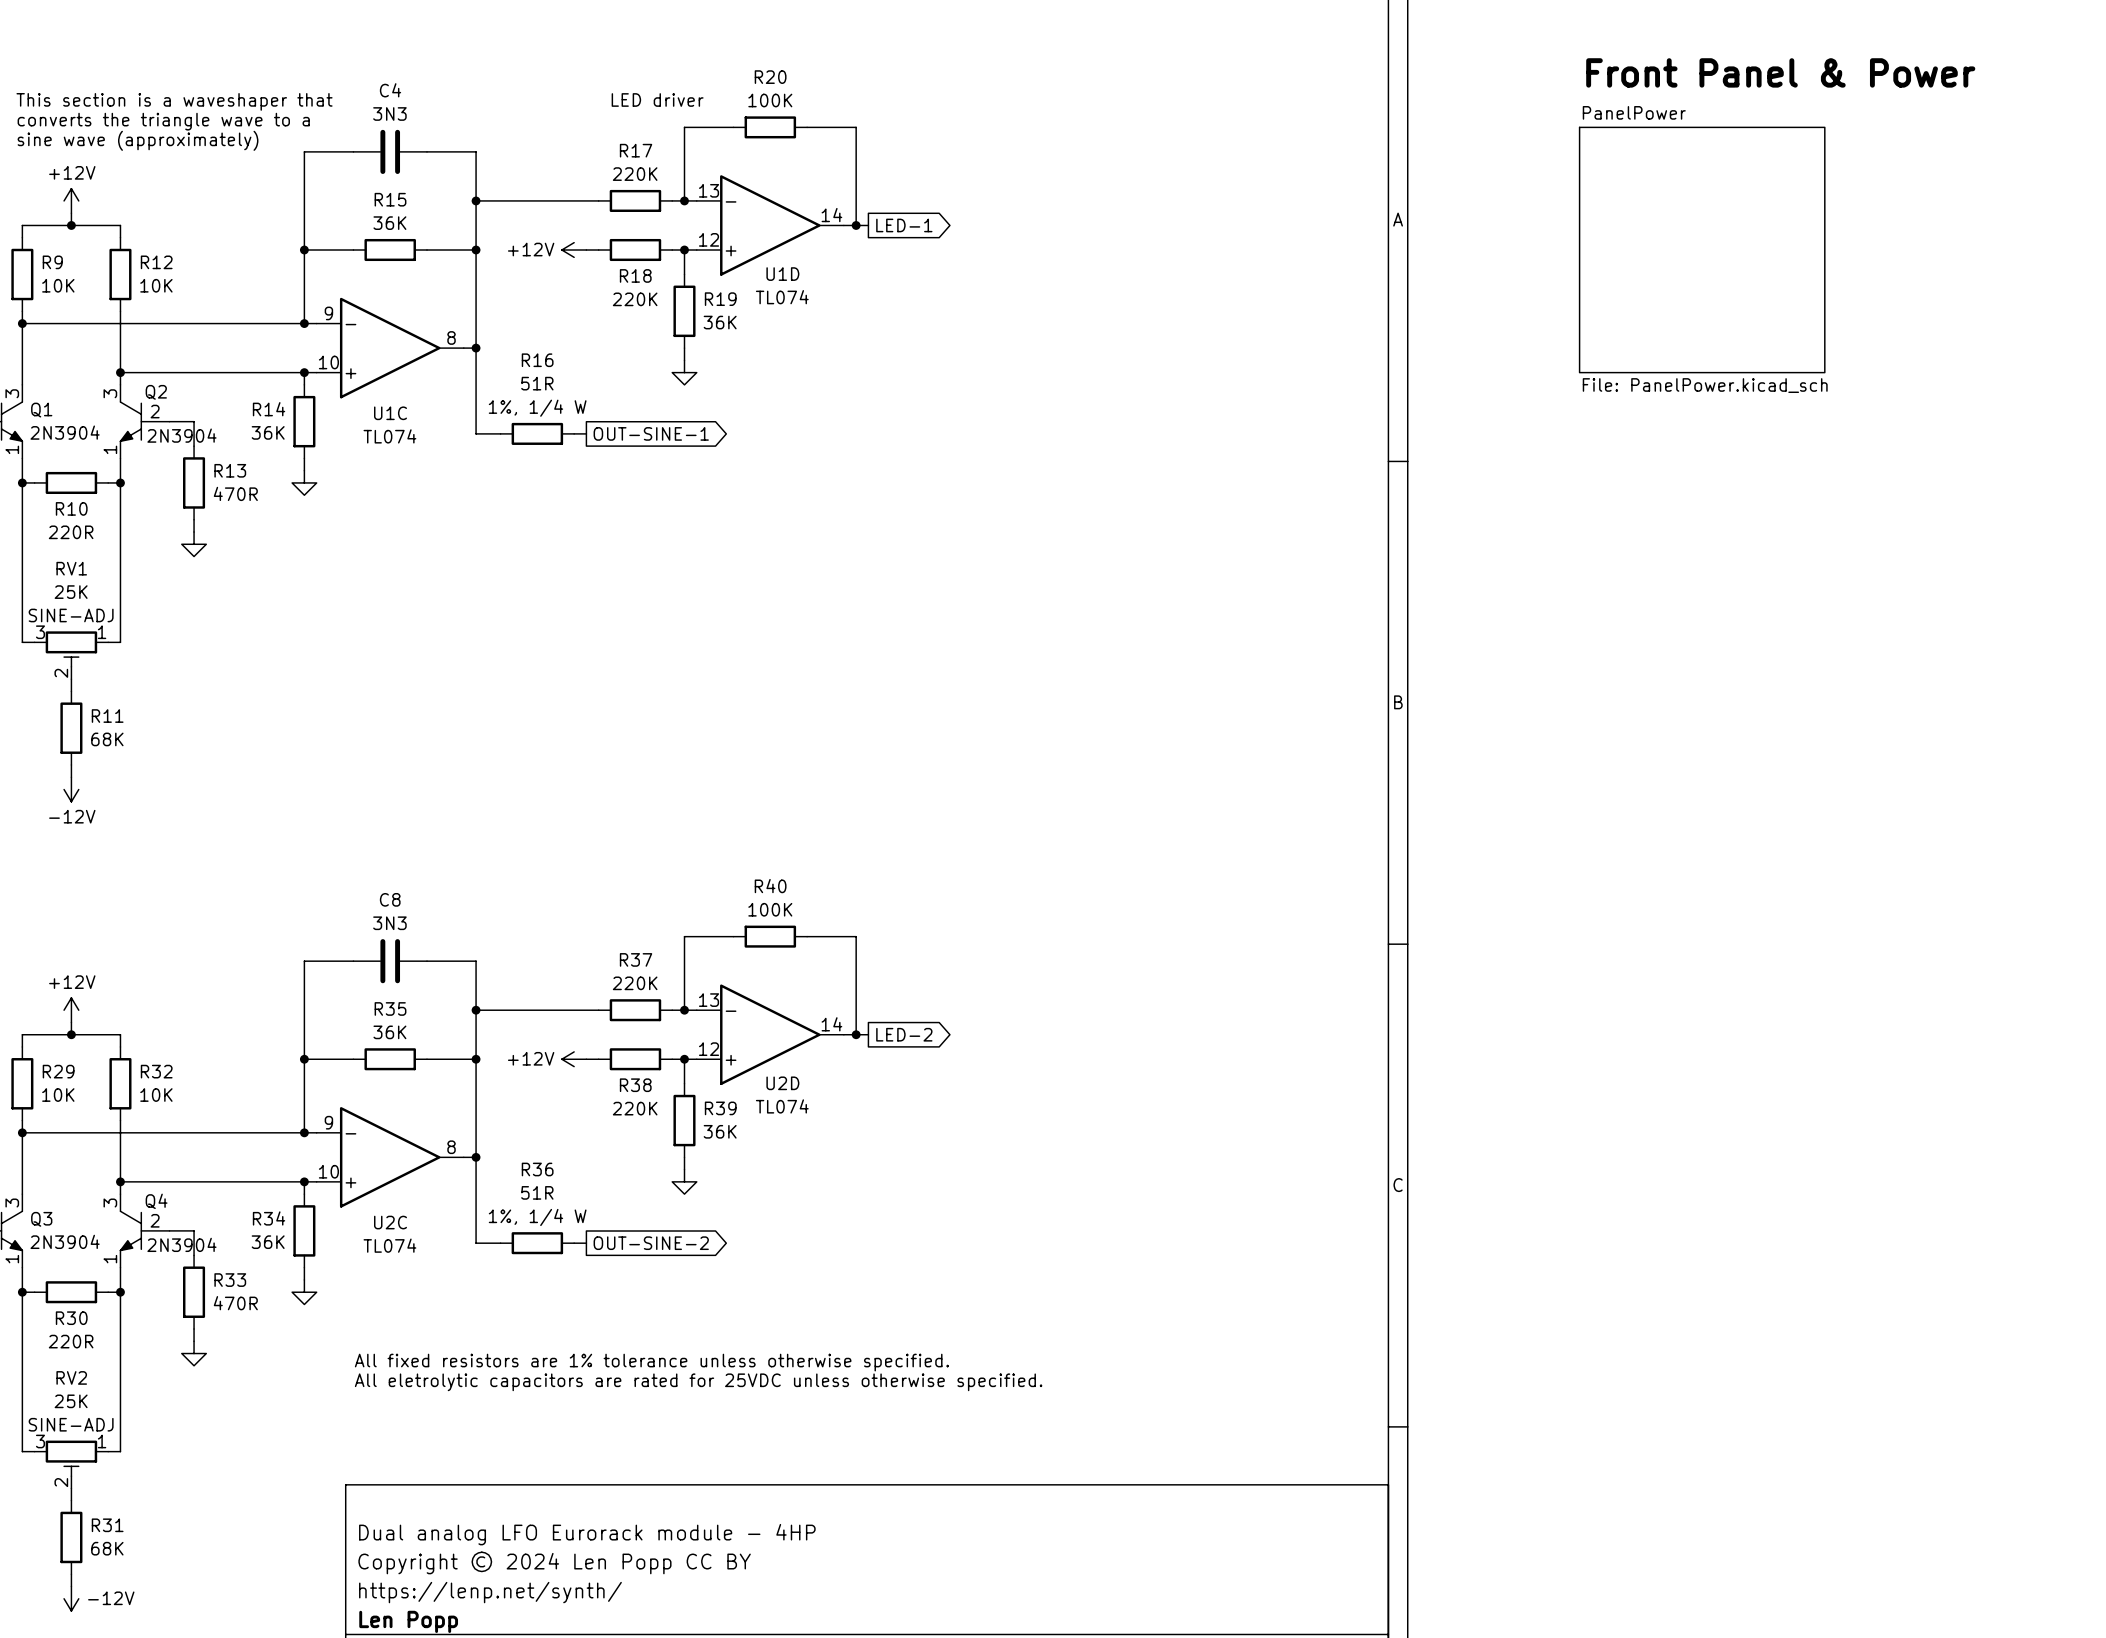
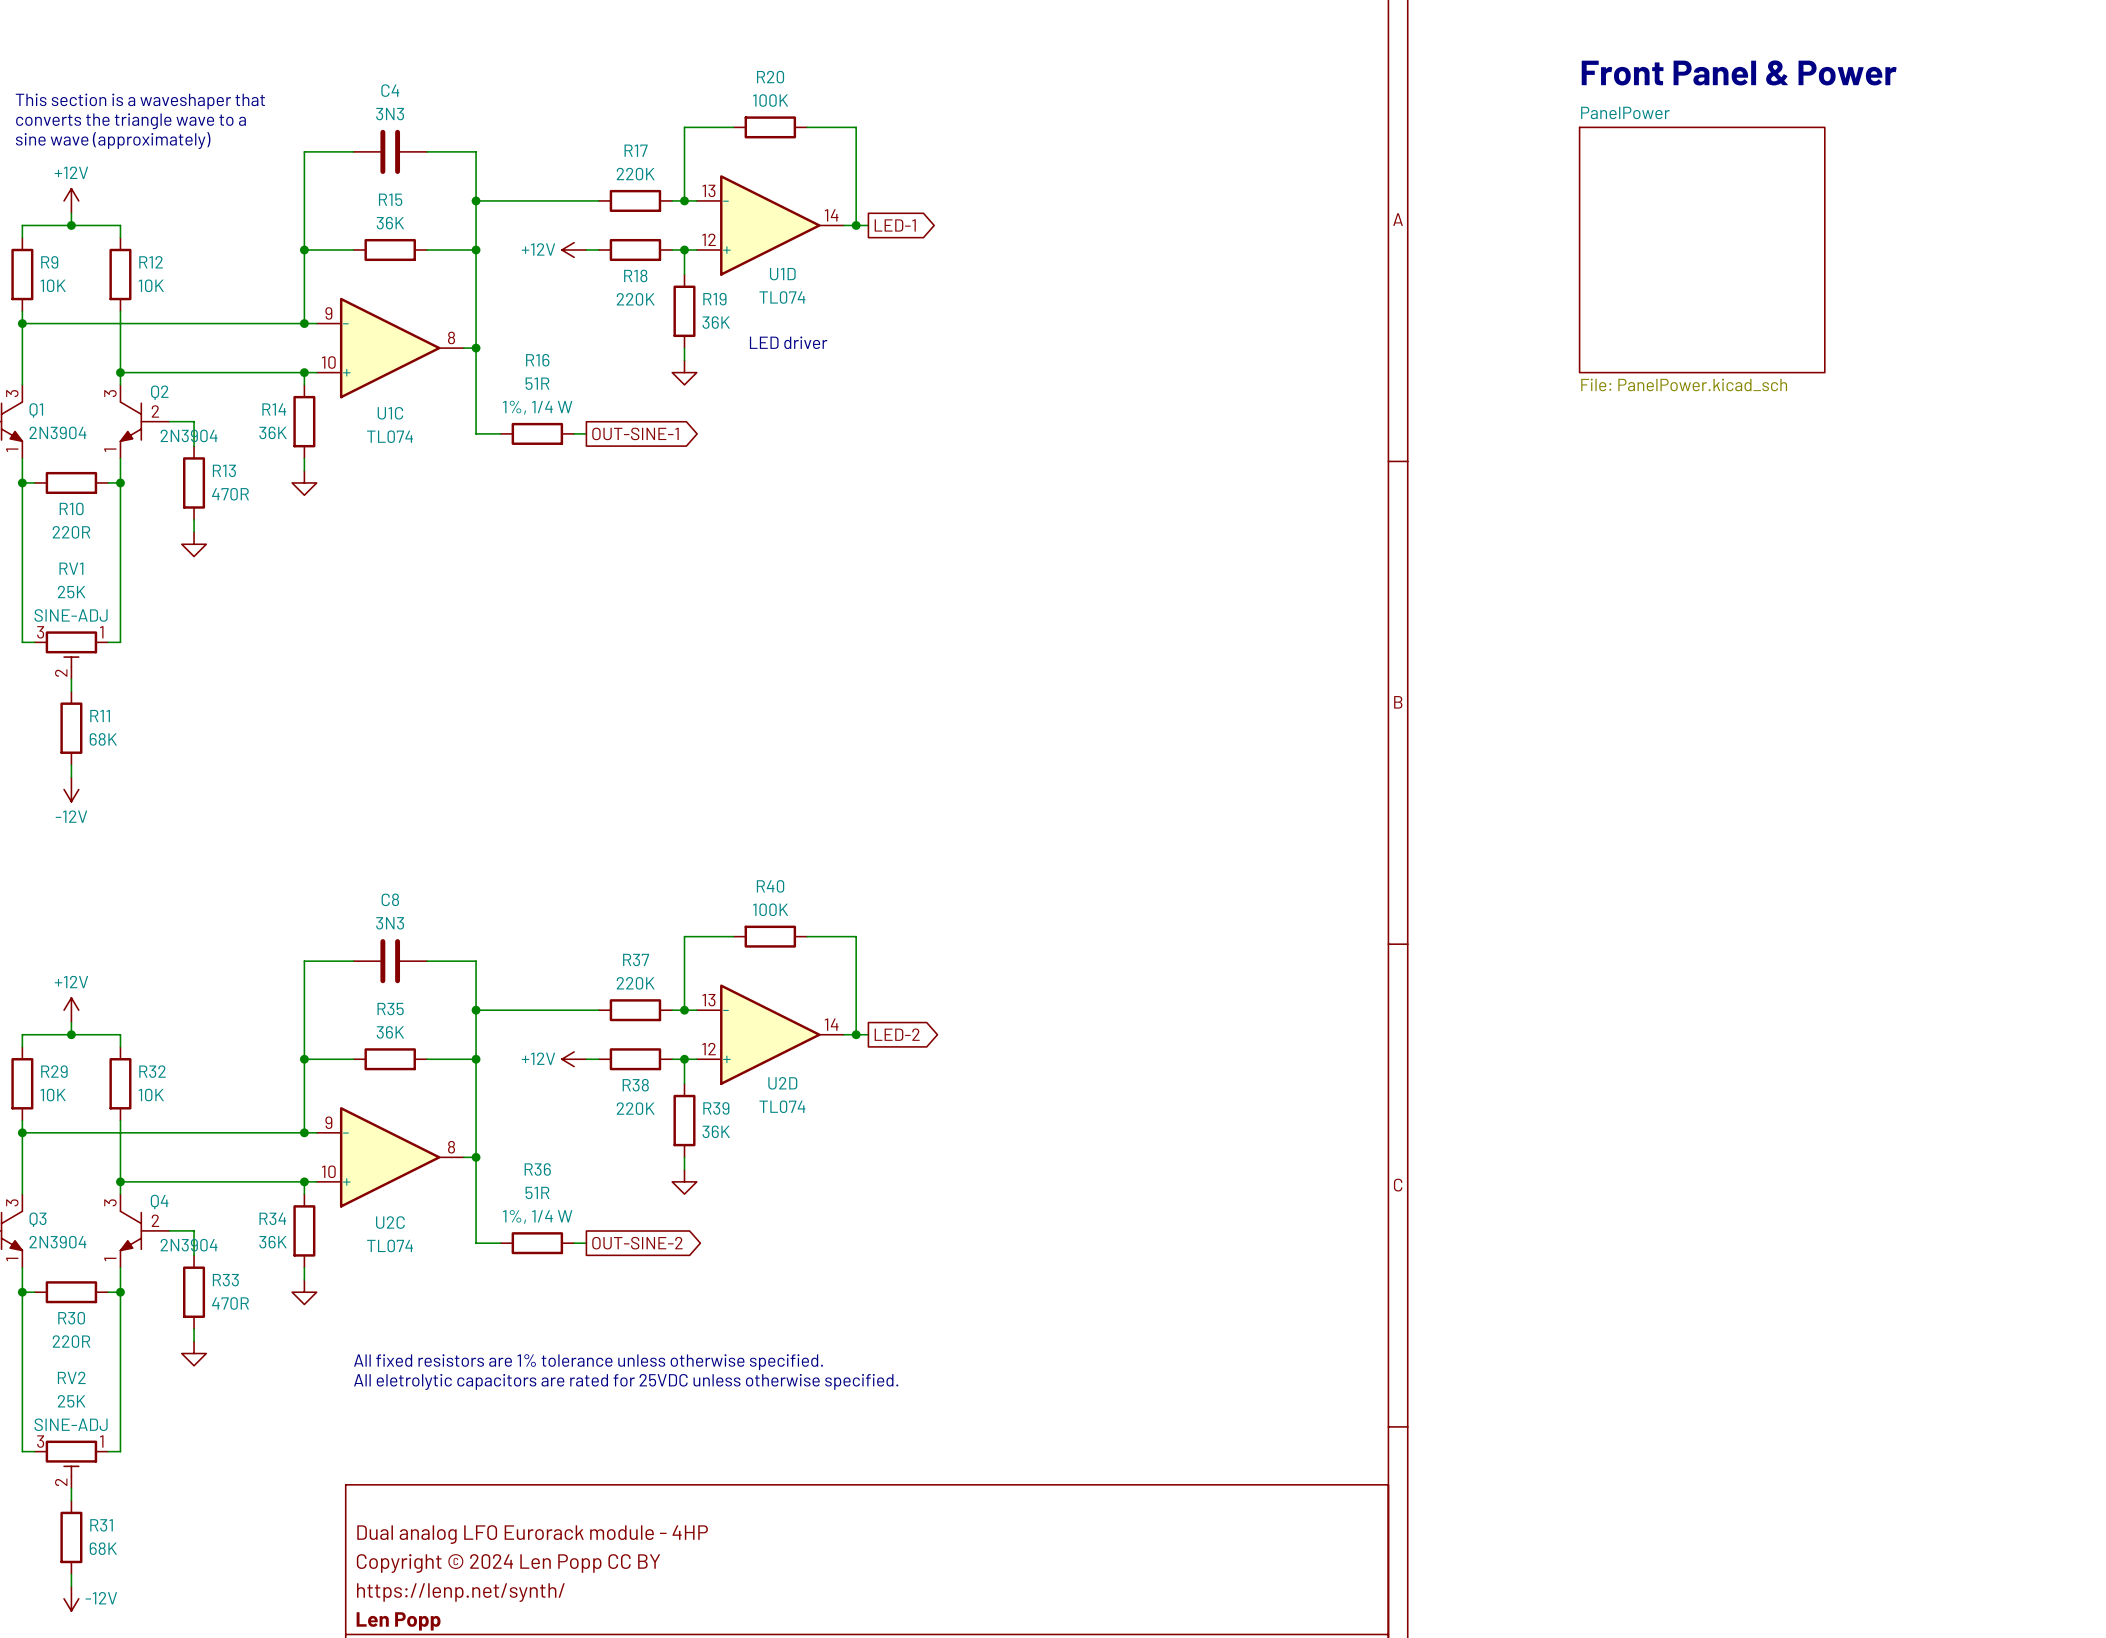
text: LED driver (657, 99) -> none
text: none -> LED driver (788, 342)

